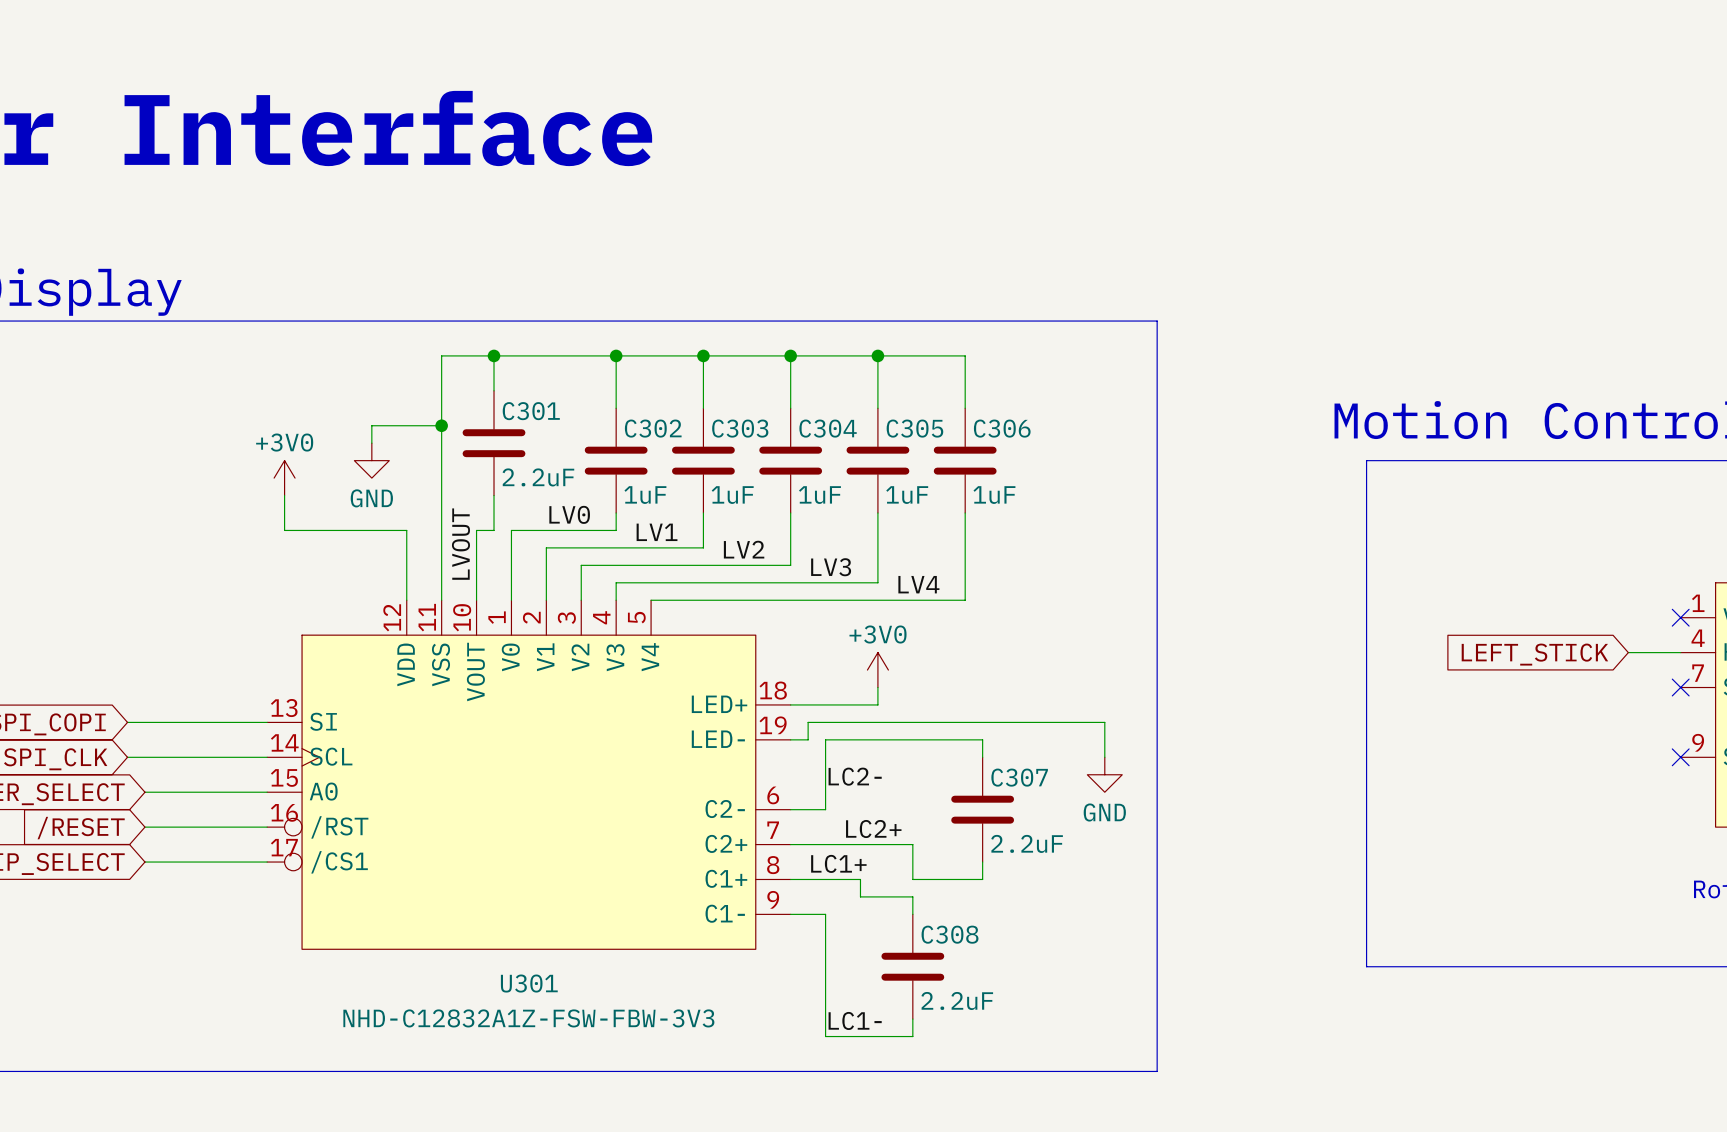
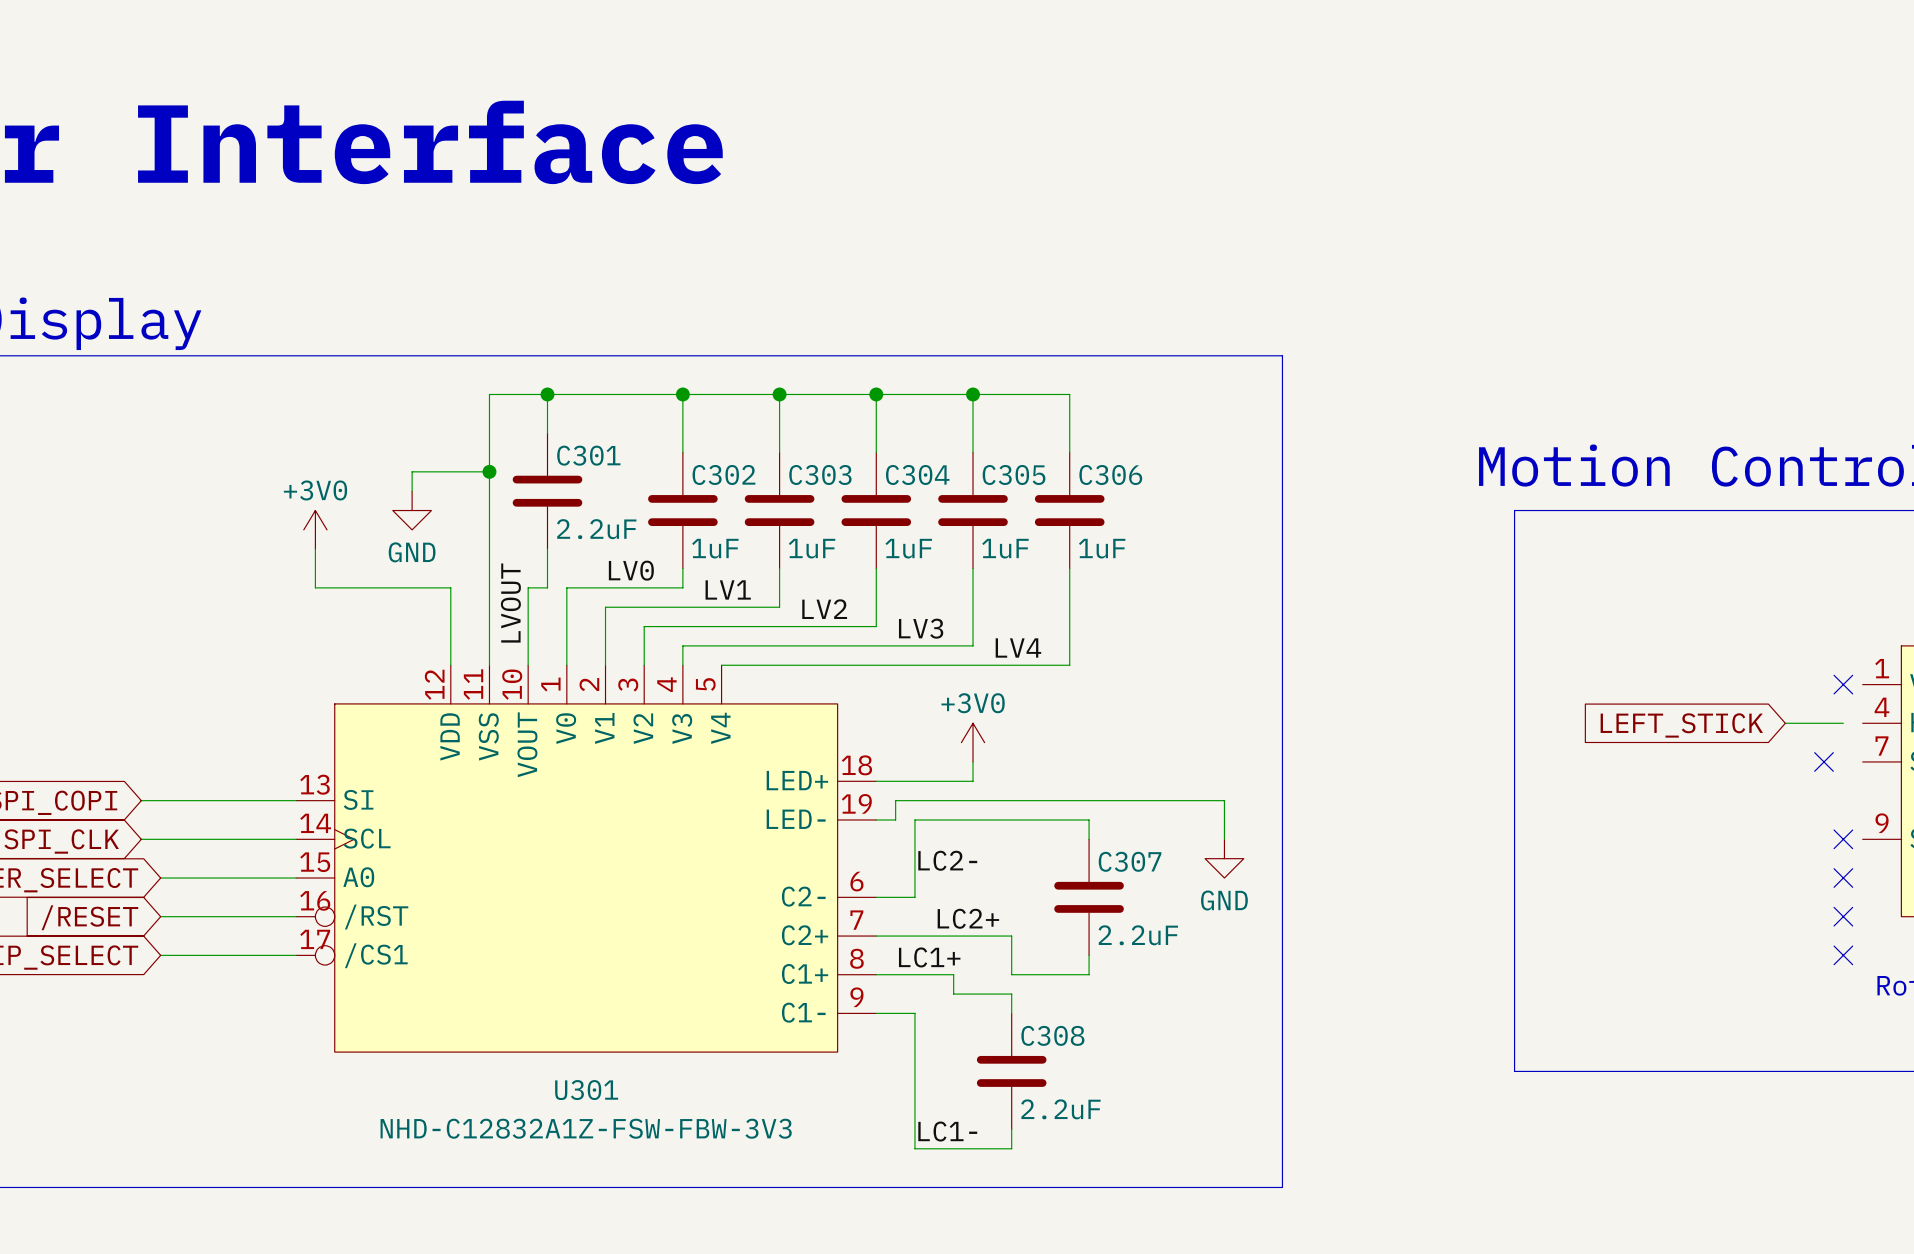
no-connect mark position: (1680, 617) -> (1843, 684)
wire: (1663, 652) (1680, 652) -> (1785, 723) (1804, 723)
global label position: LEFT_STICK (1534, 654) -> LEFT_STICK (1681, 725)
no-connect mark position: (1680, 687) -> (1824, 761)
no-connect mark position: (1680, 757) -> (1843, 839)
no-connect mark: none -> (1843, 878)
no-connect mark: none -> (1843, 916)
no-connect mark: none -> (1843, 955)

